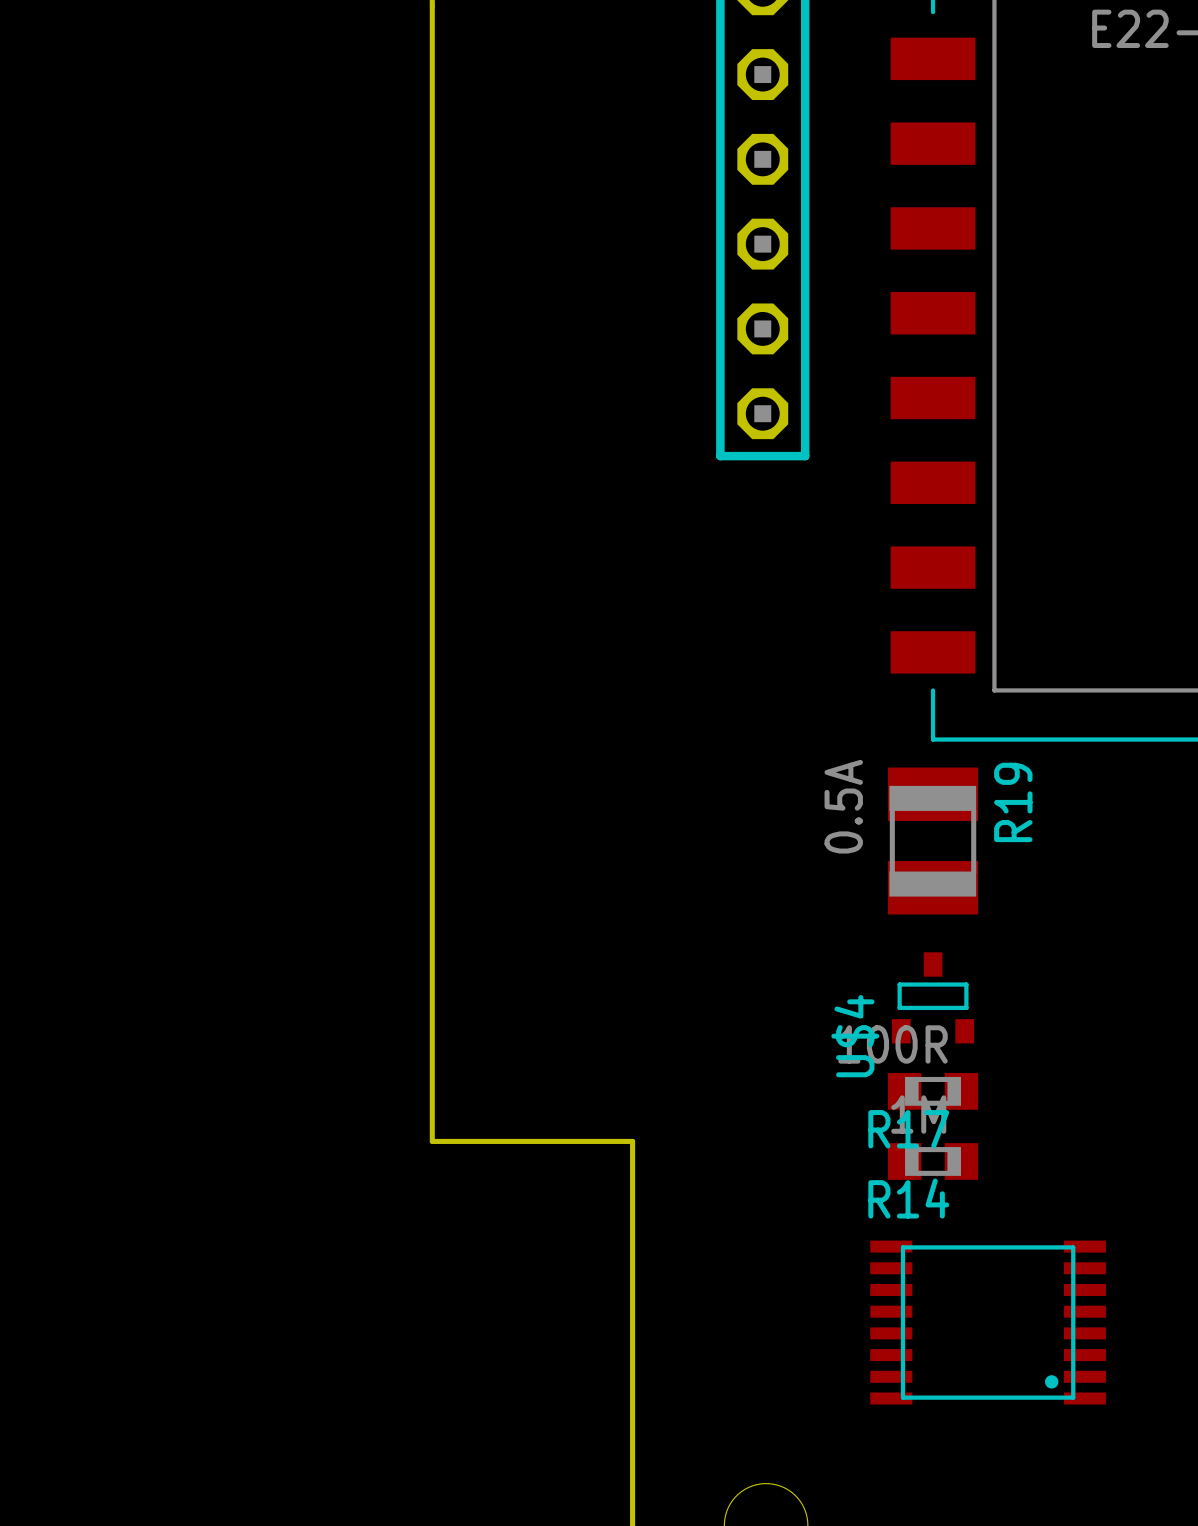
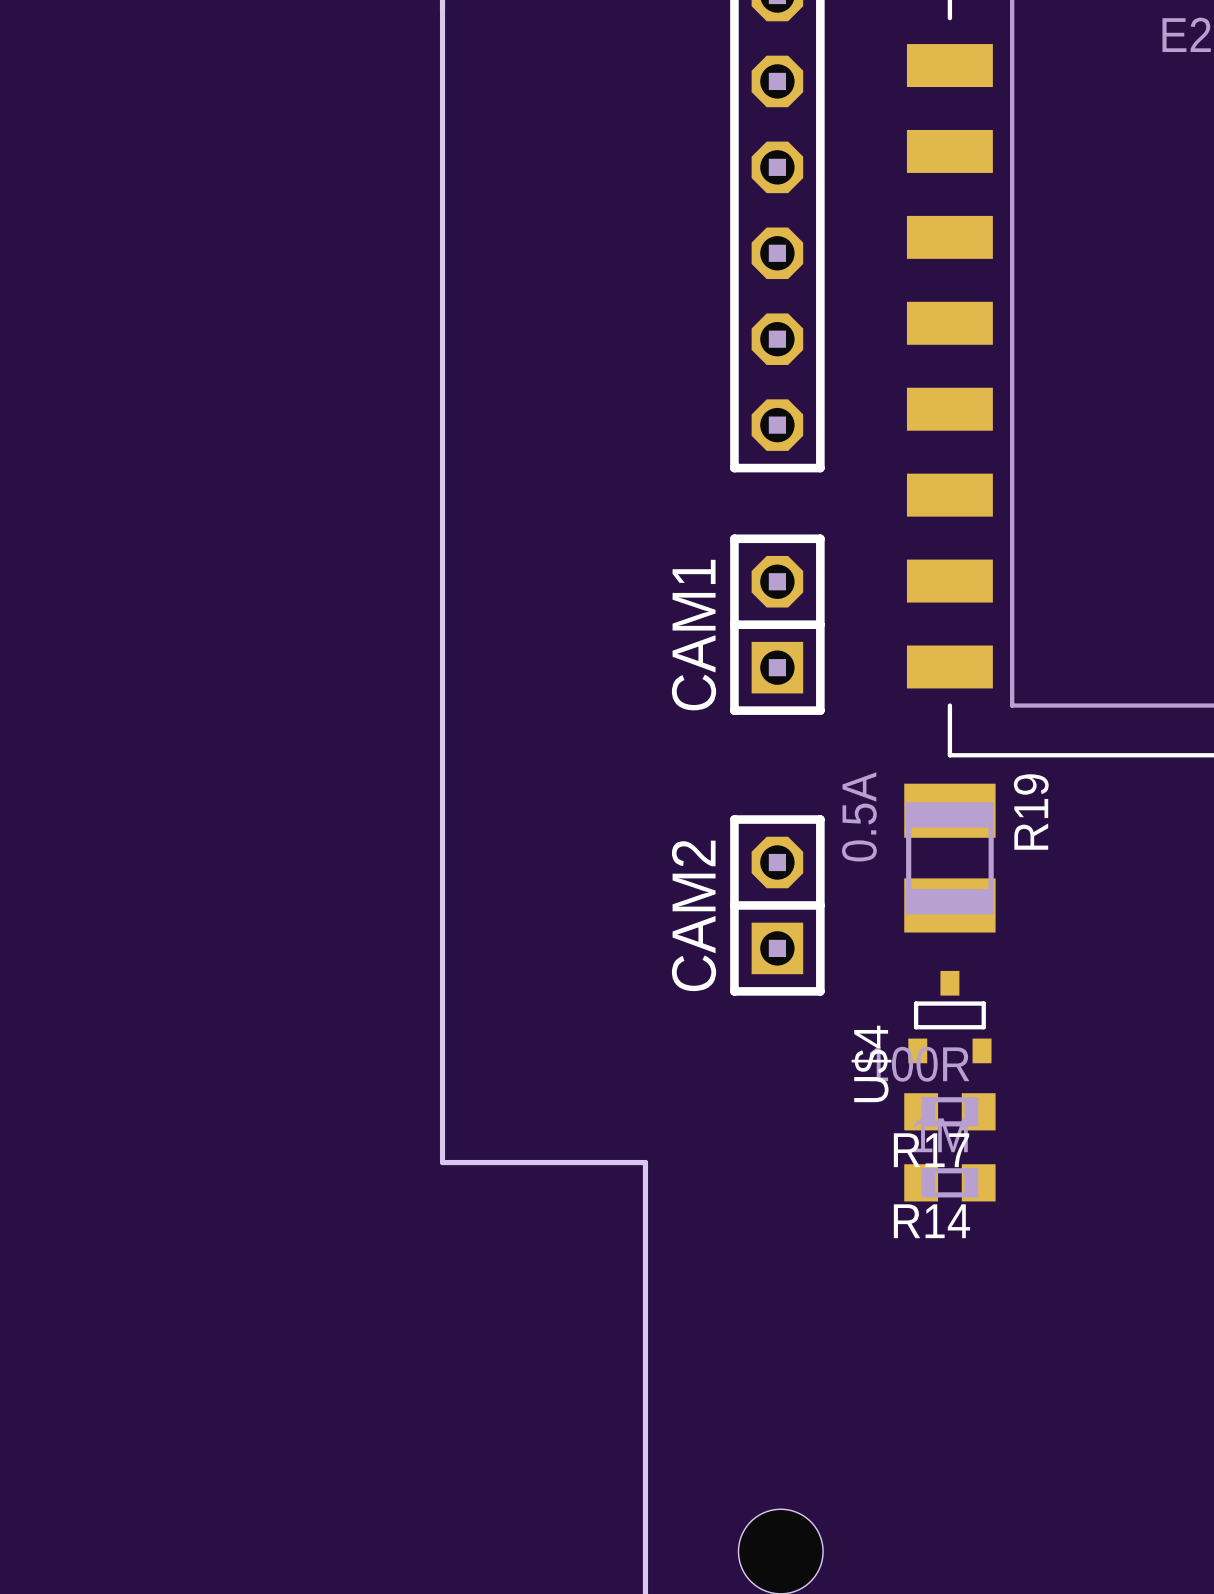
CAM1: none -> (777, 624)
CAM2: none -> (777, 905)
part: (988, 1322) -> none

